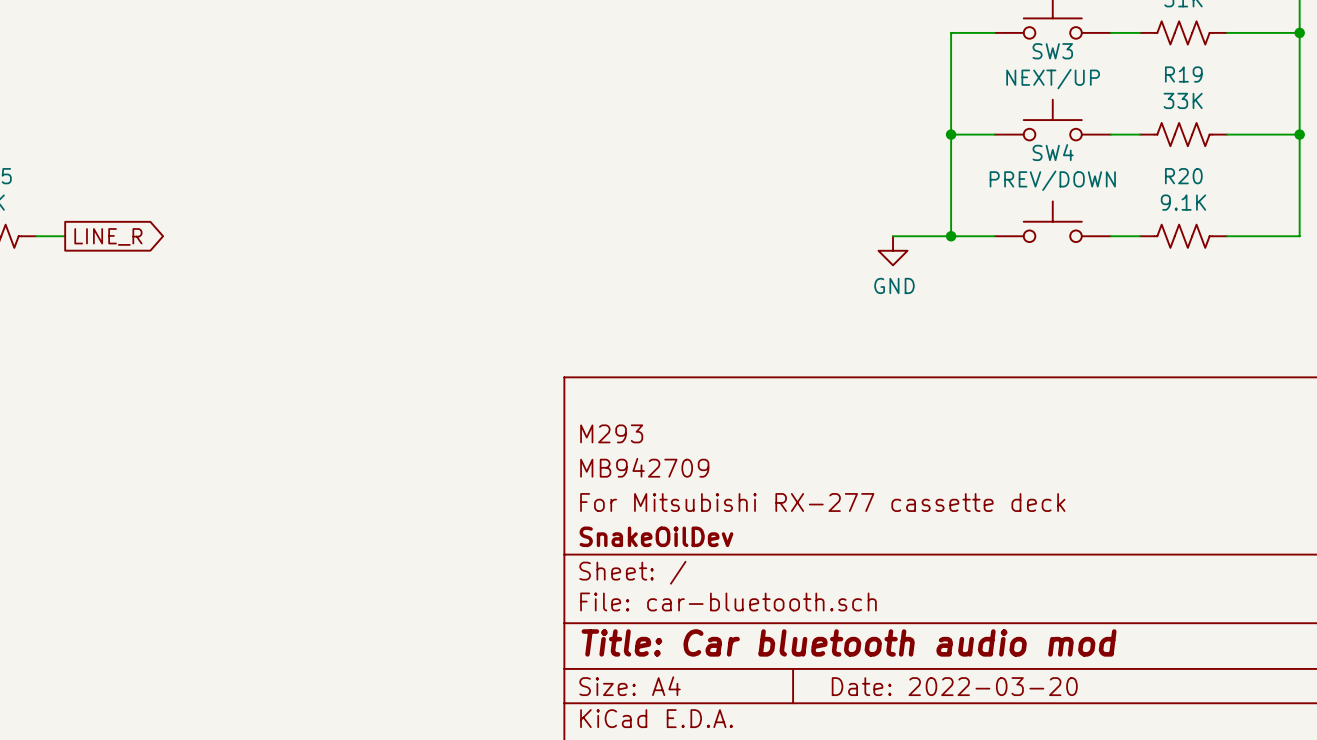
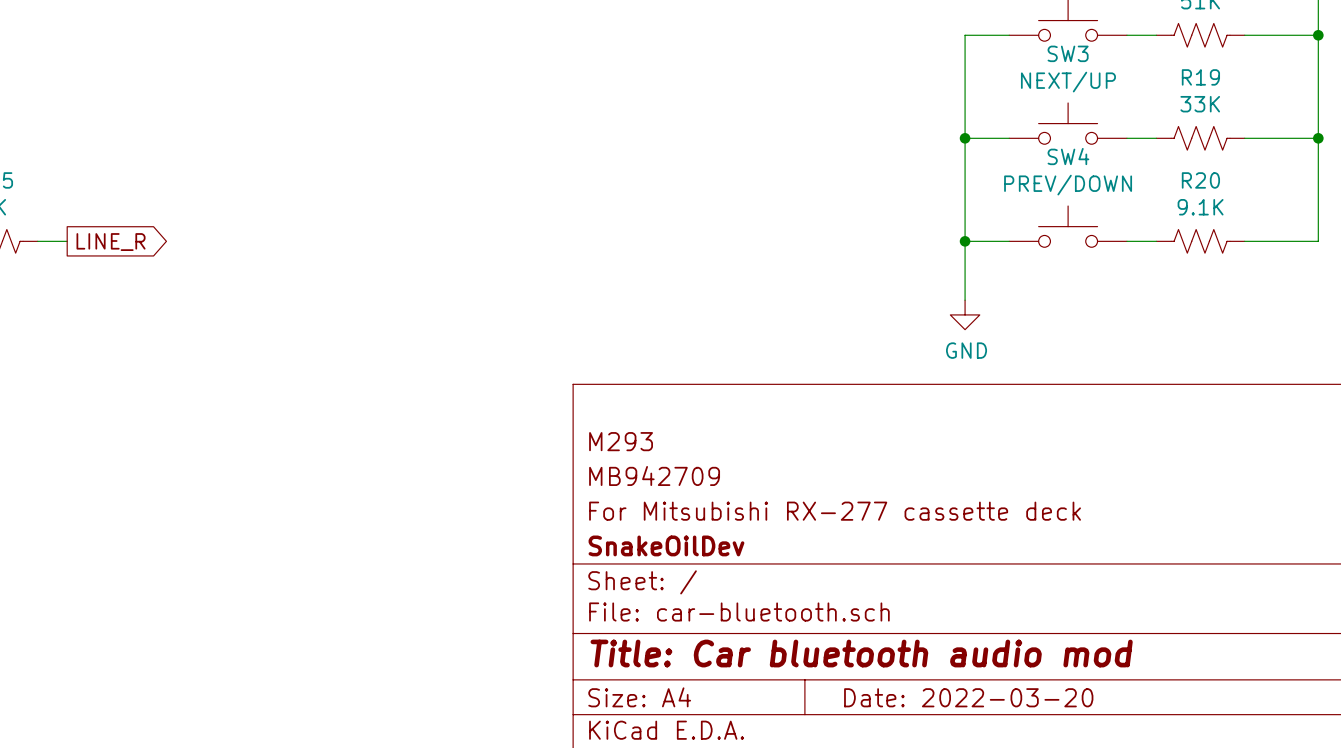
wire: (893, 236) (951, 236) -> (965, 300) (965, 241)
power symbol position: GND (893, 250) -> GND (965, 314)

